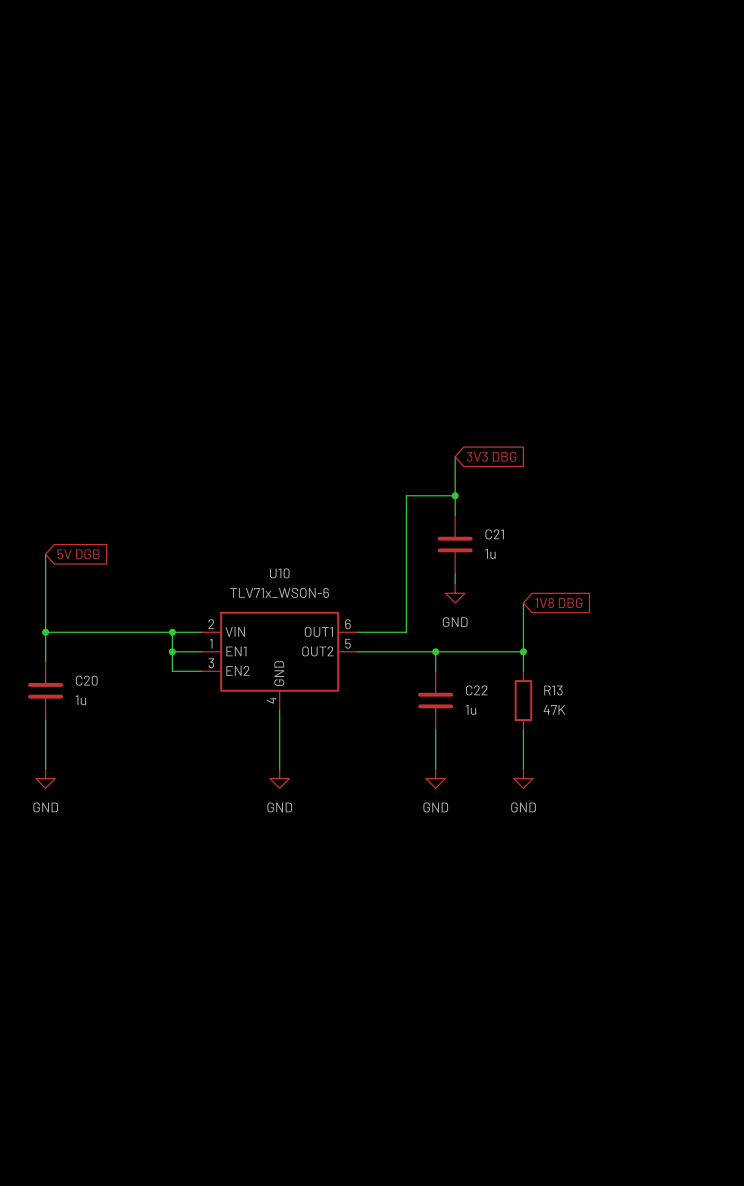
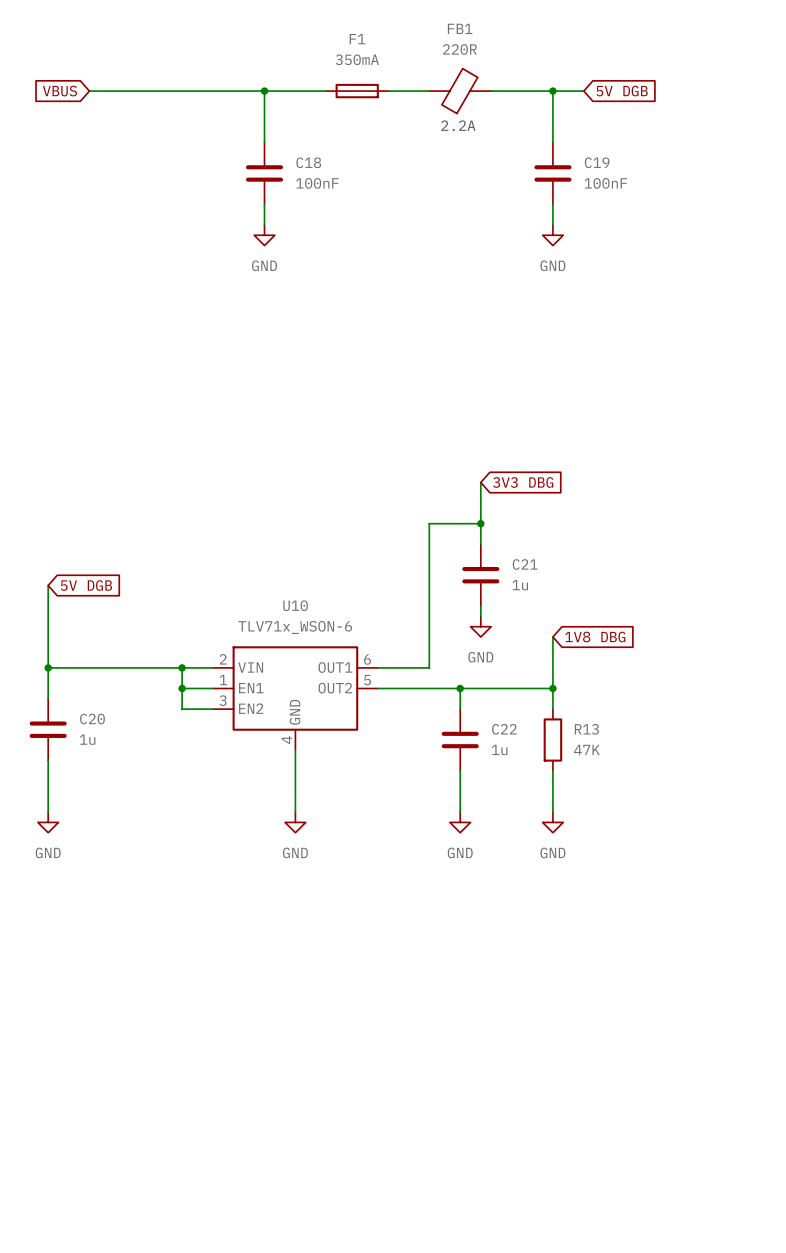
global label: none -> VBUS (59, 91)
wire: none -> (89, 91) (326, 91)
wire: none -> (264, 91) (264, 142)
junction: none -> (264, 91)
F1: none -> 350mA (357, 91)
wire: none -> (388, 91) (429, 91)
FB1: none -> 220R (460, 91)
wire: none -> (491, 91) (583, 91)
wire: none -> (552, 91) (552, 142)
junction: none -> (552, 91)
global label: none -> 5V DGB (622, 91)
text: none -> 2.2A (458, 125)
C18: none -> 100nF (264, 173)
C19: none -> 100nF (552, 173)
wire: none -> (264, 204) (264, 224)
wire: none -> (552, 204) (552, 224)
power symbol: none -> GND (264, 235)
power symbol: none -> GND (552, 235)

